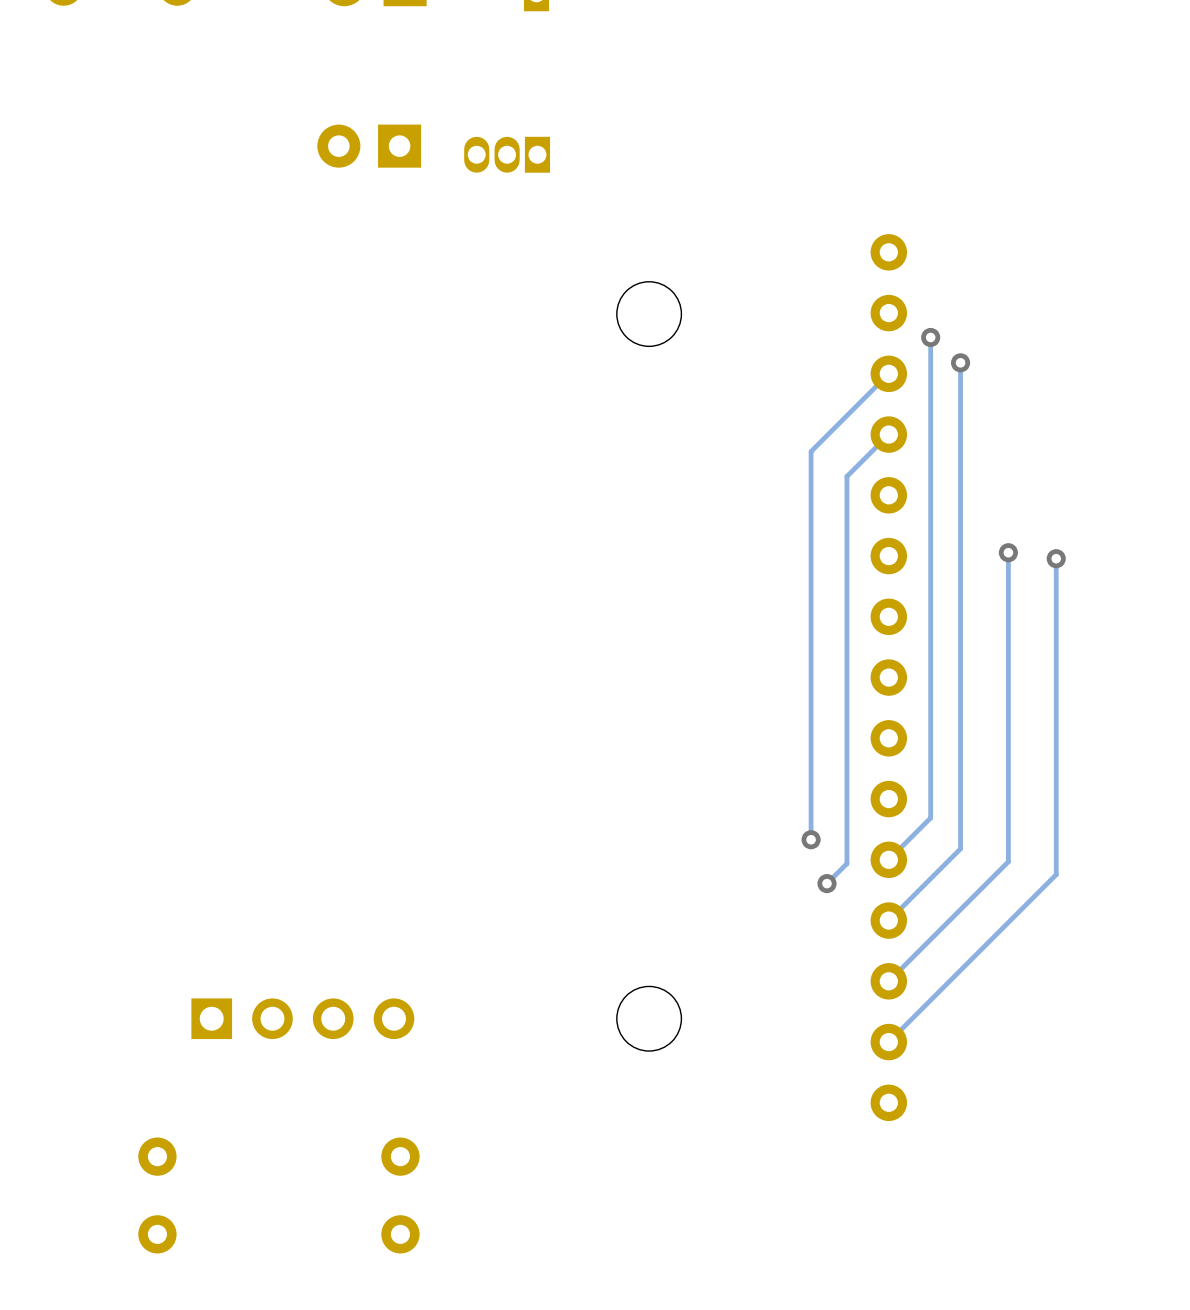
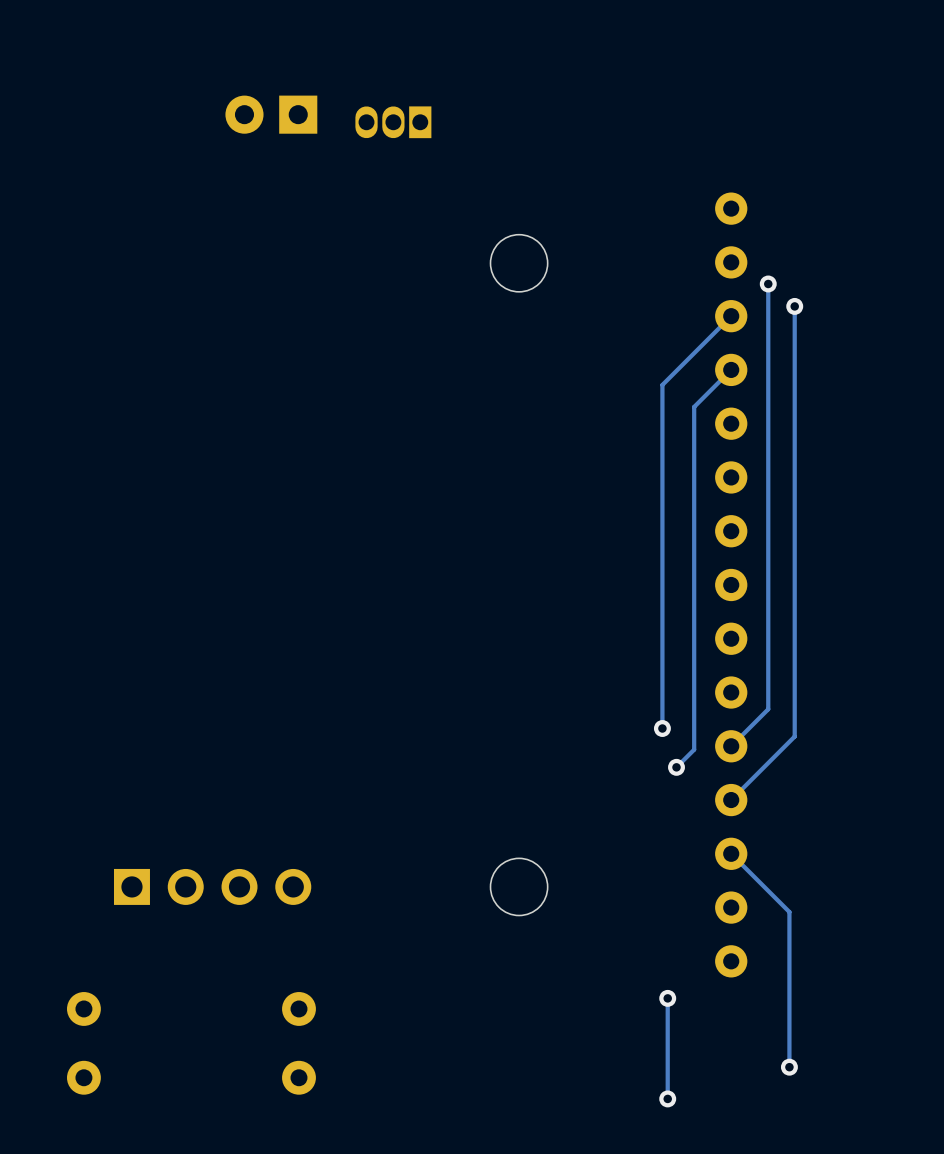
track: (1008, 552) (1008, 861) (888, 981) -> (789, 1067) (789, 912) (731, 853)
via: (1008, 552) -> none
track: (1056, 558) (1056, 874) (888, 1042) -> none
via: (1056, 558) -> none
track: none -> (667, 998) (667, 1098)
via: none -> (667, 998)
via: none -> (789, 1067)
via: none -> (667, 1098)

